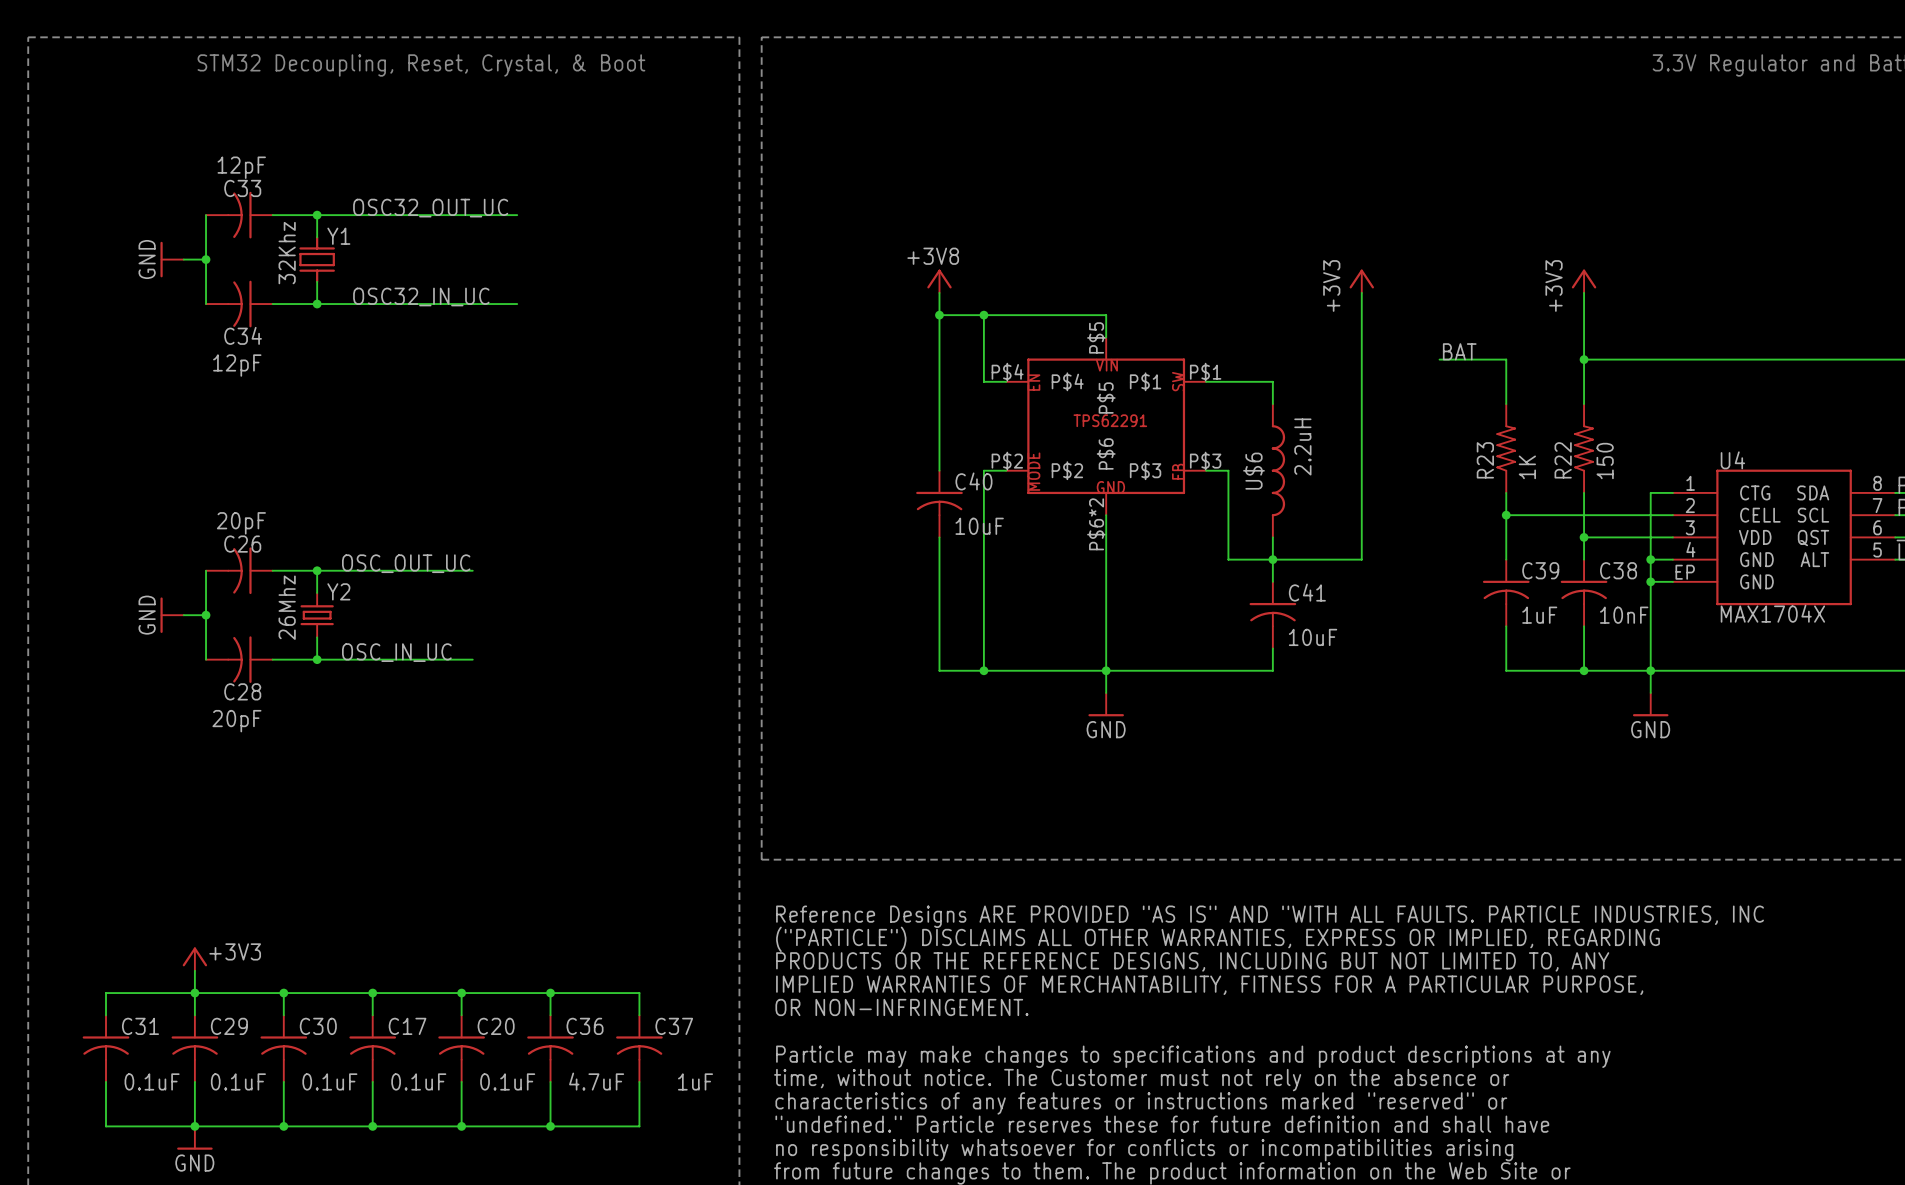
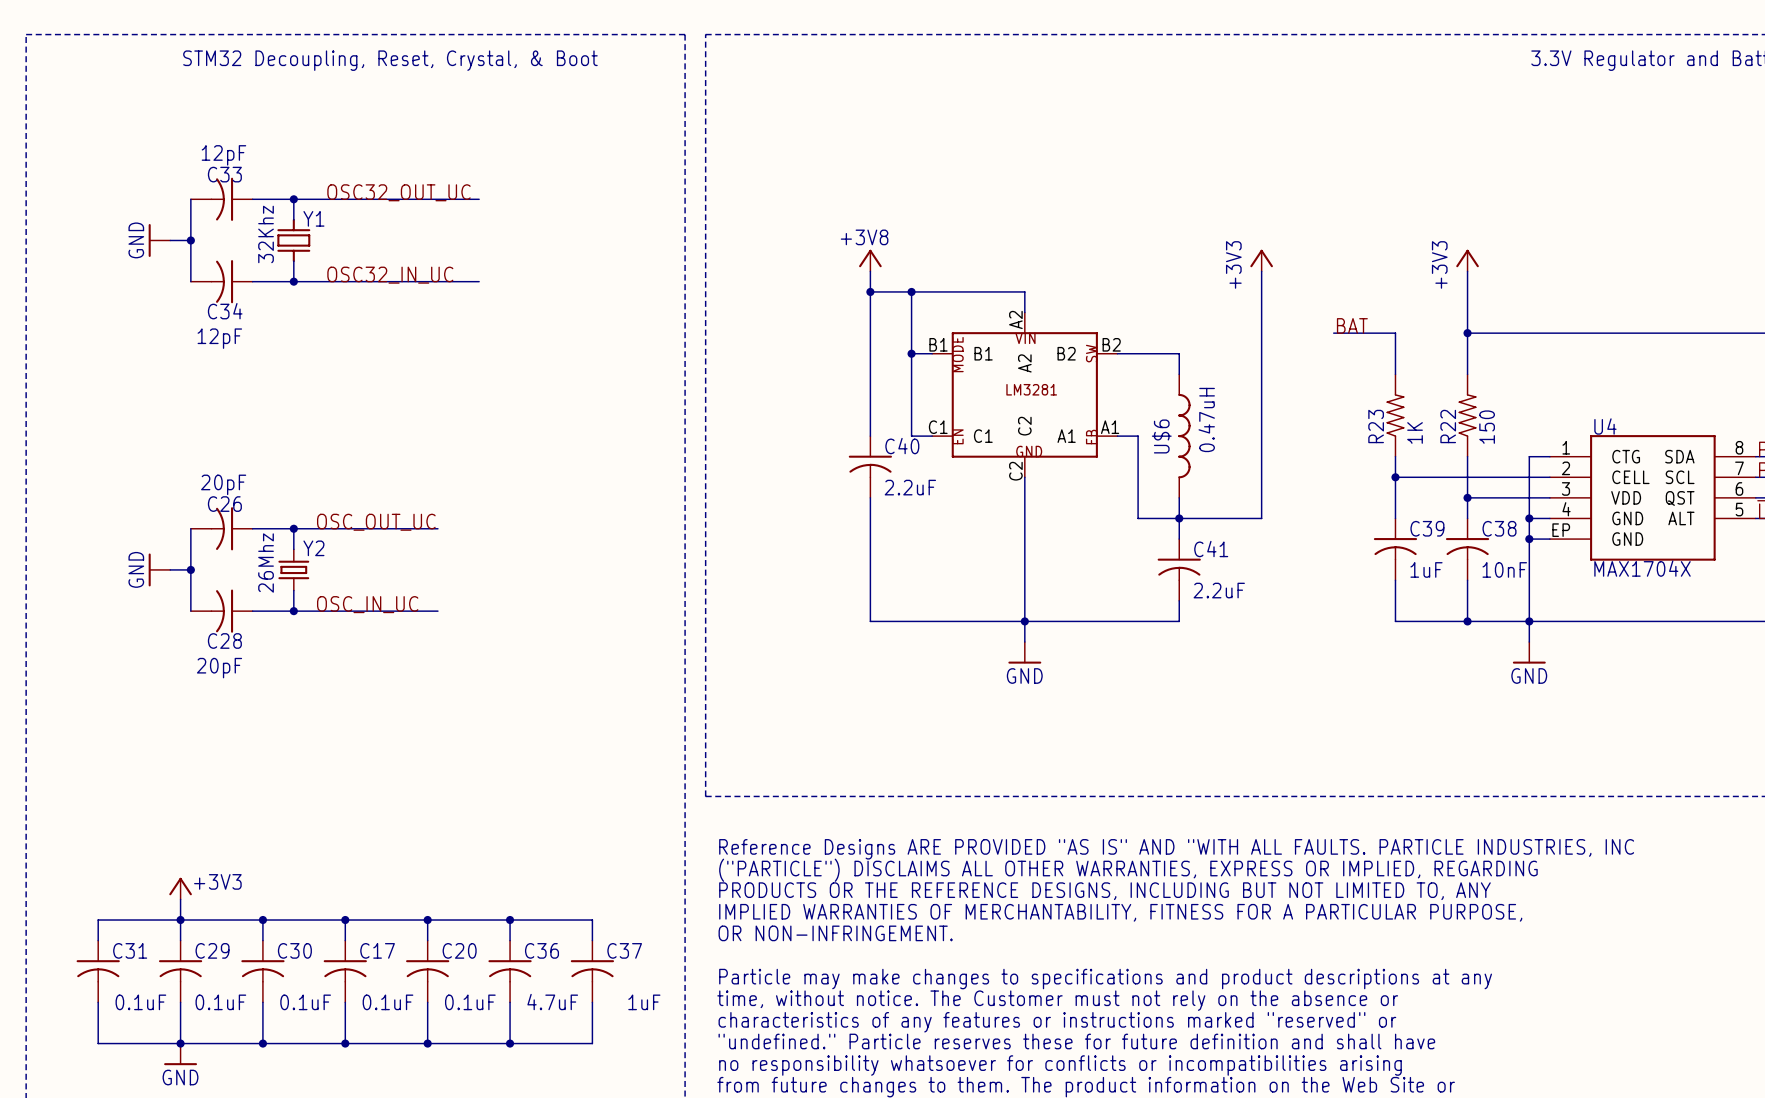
part symbol: [1006, 337, 1207, 516] -> [932, 312, 1118, 478]
junction: none -> (911, 353)
U$6 value: 2.2uH (1302, 446) -> 0.47uH (1206, 419)
wire: (983, 470) (983, 670) -> (911, 436) (911, 353)
C40 value: 10uF (979, 526) -> 2.2uF (910, 487)
C41 value: 10uF (1313, 637) -> 2.2uF (1219, 590)
junction: (983, 670) -> none

